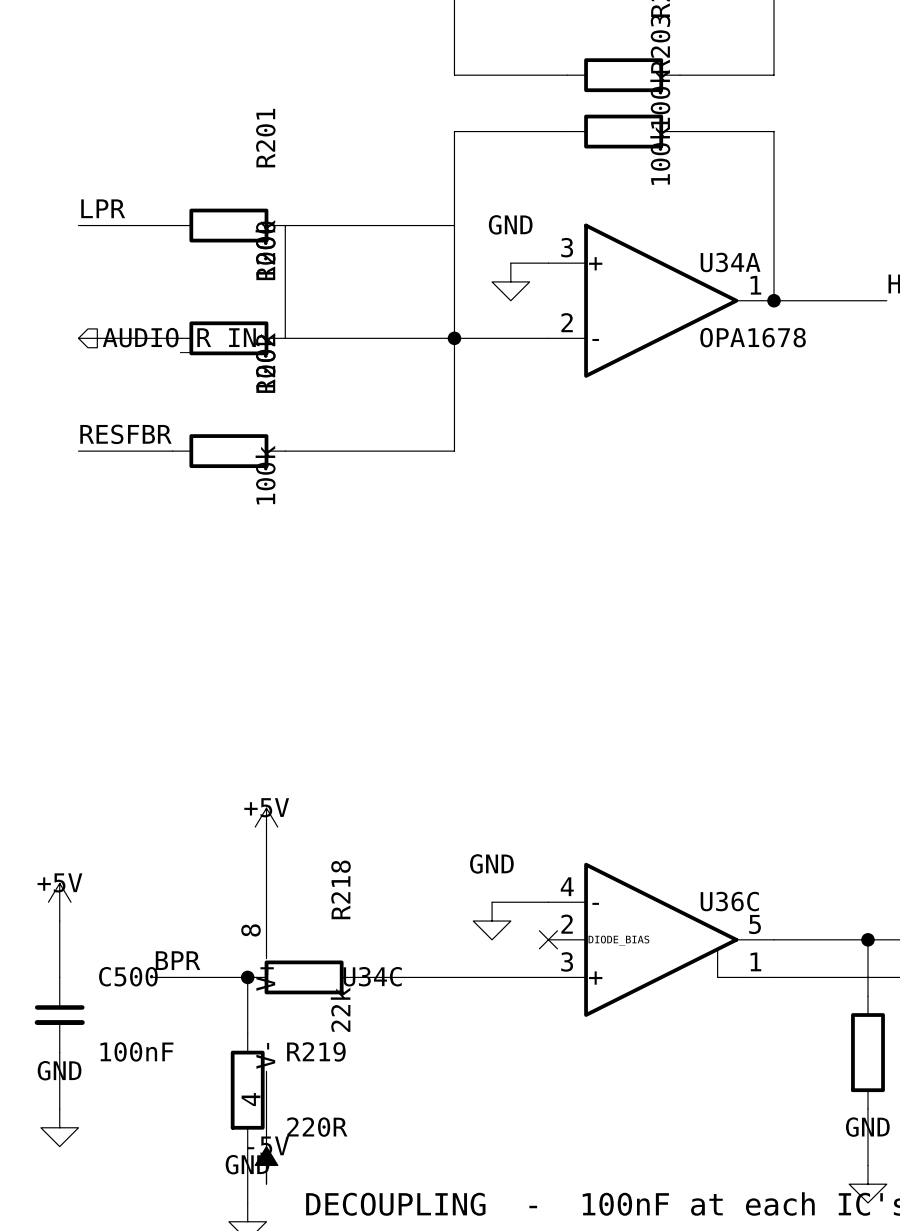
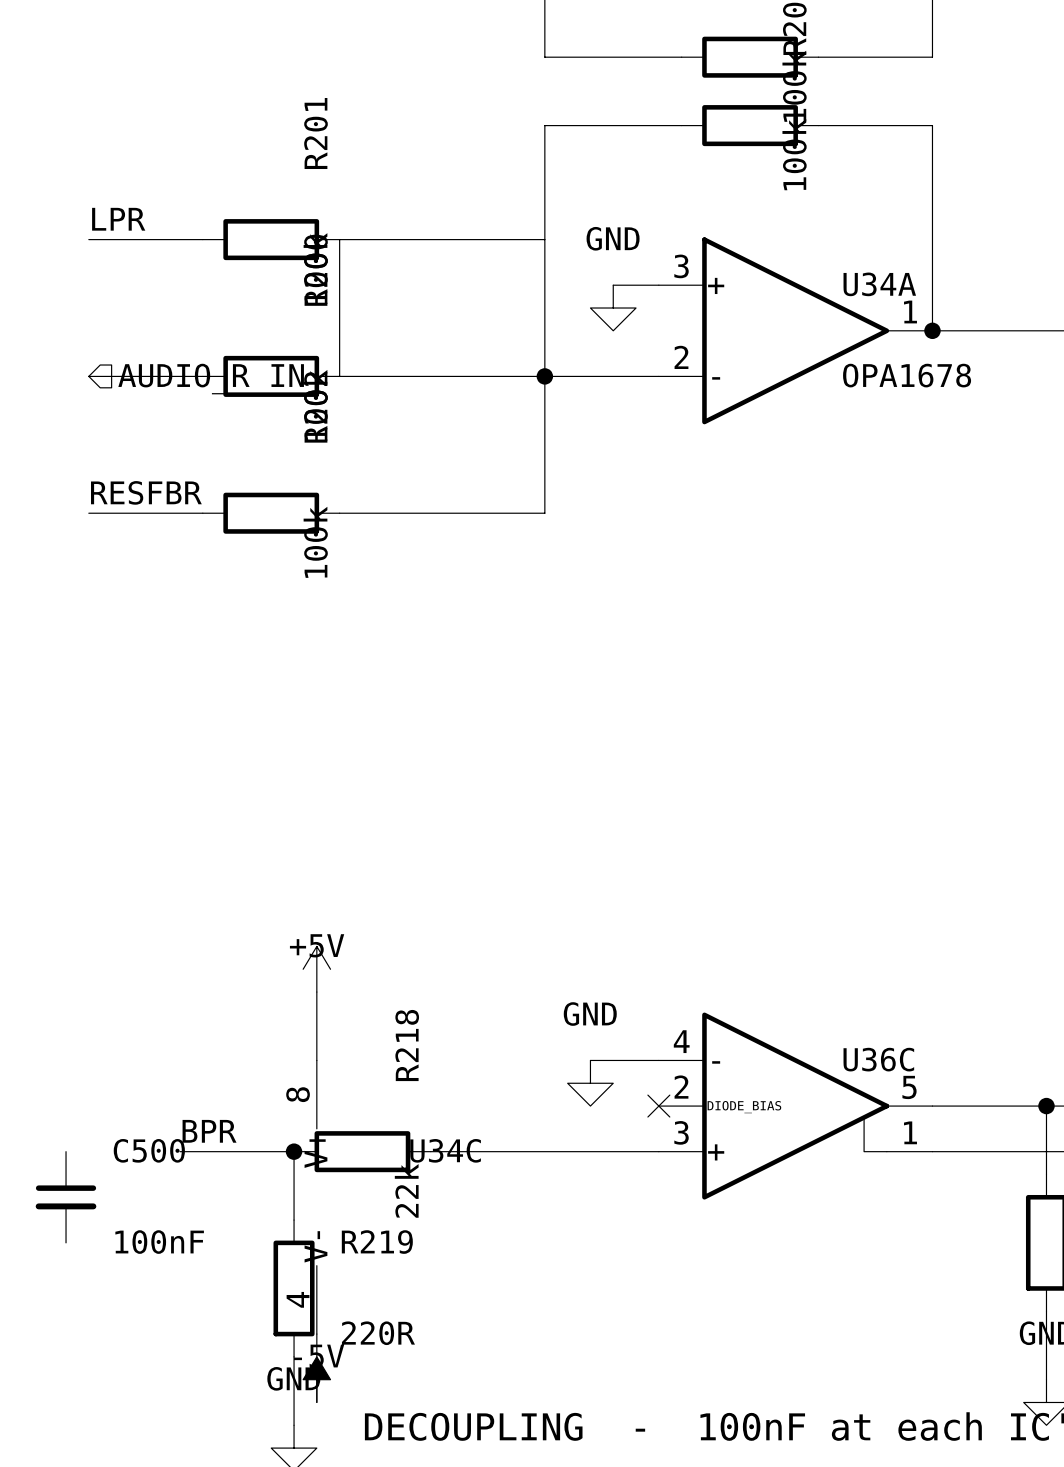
power symbol: +5V (59, 902) -> none
wire: (59, 921) (59, 977) -> none
wire: (59, 1052) (59, 1108) -> none
power symbol: GND (59, 1127) -> none

